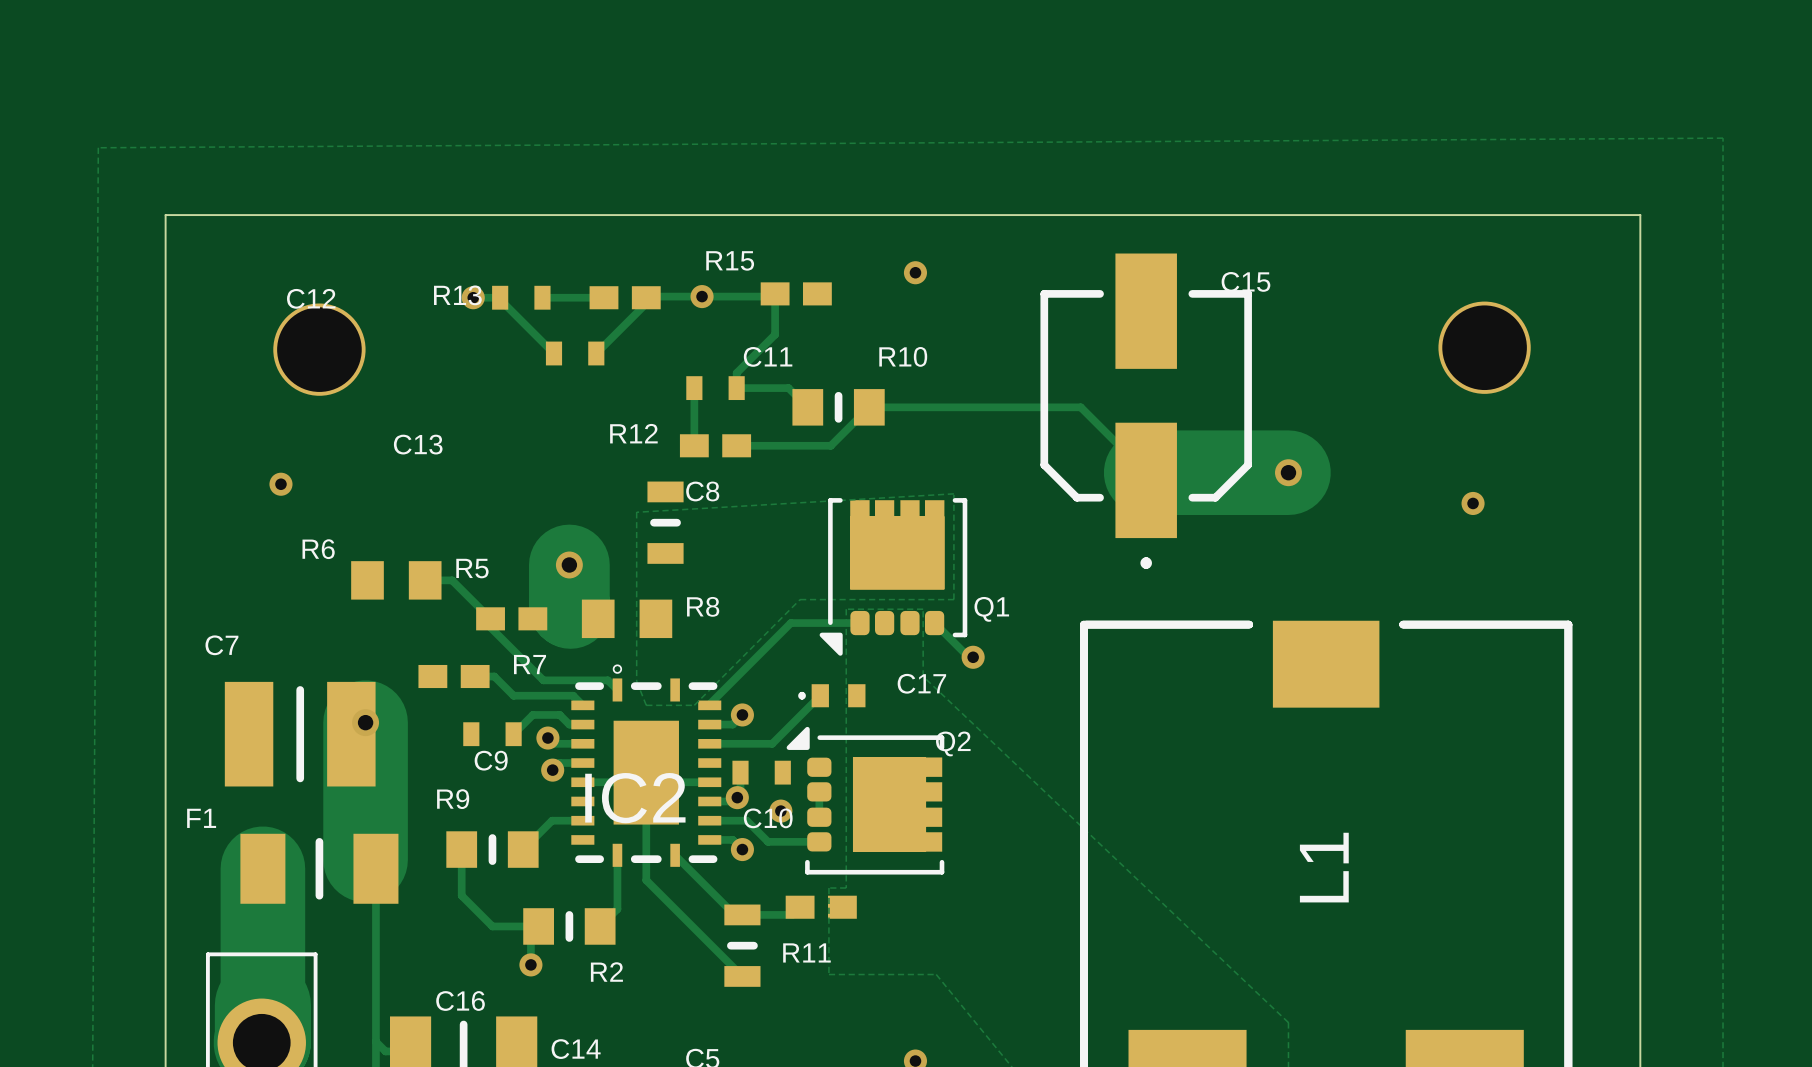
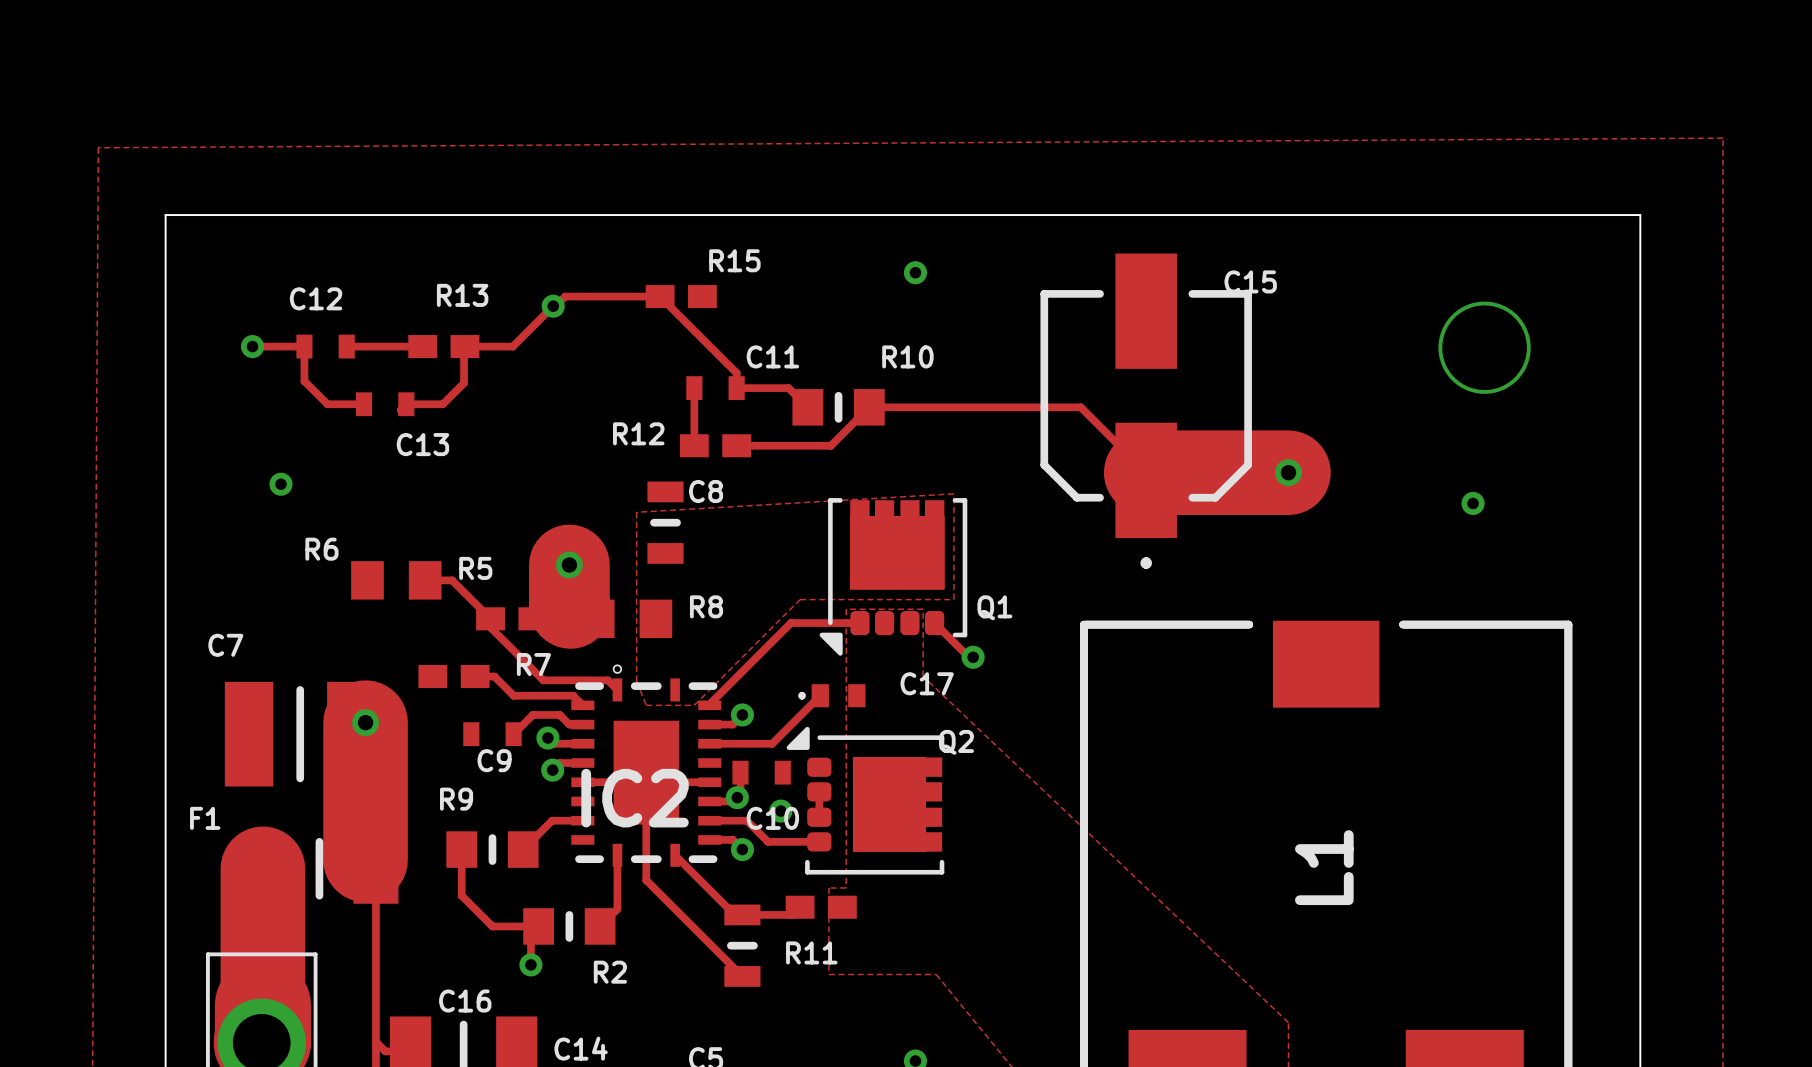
part: (796, 293) -> none
track: (647, 296) (646, 303) (596, 353) -> (647, 296) (565, 296) (512, 346) (464, 346)
track: (660, 296) (772, 296) (775, 293) (775, 334) (736, 373) -> (660, 296) (736, 373)
via: (702, 296) -> none
track: (473, 297) (500, 297) (554, 353) -> none
via: (473, 297) -> none
part: (521, 297) -> none
track: (542, 297) (603, 297) -> none
part position: (625, 297) -> (681, 296)
part footprint: [273, 303, 366, 396] -> [296, 334, 355, 359]
via: none -> (553, 306)
track: none -> (252, 346) (304, 346) (304, 381) (327, 404) (364, 404)
via: none -> (252, 346)
track: none -> (346, 346) (421, 346)
part: none -> (443, 346)
track: none -> (464, 346) (464, 383) (442, 404) (406, 404) (400, 410)
part: (575, 353) -> none
part: none -> (385, 404)

